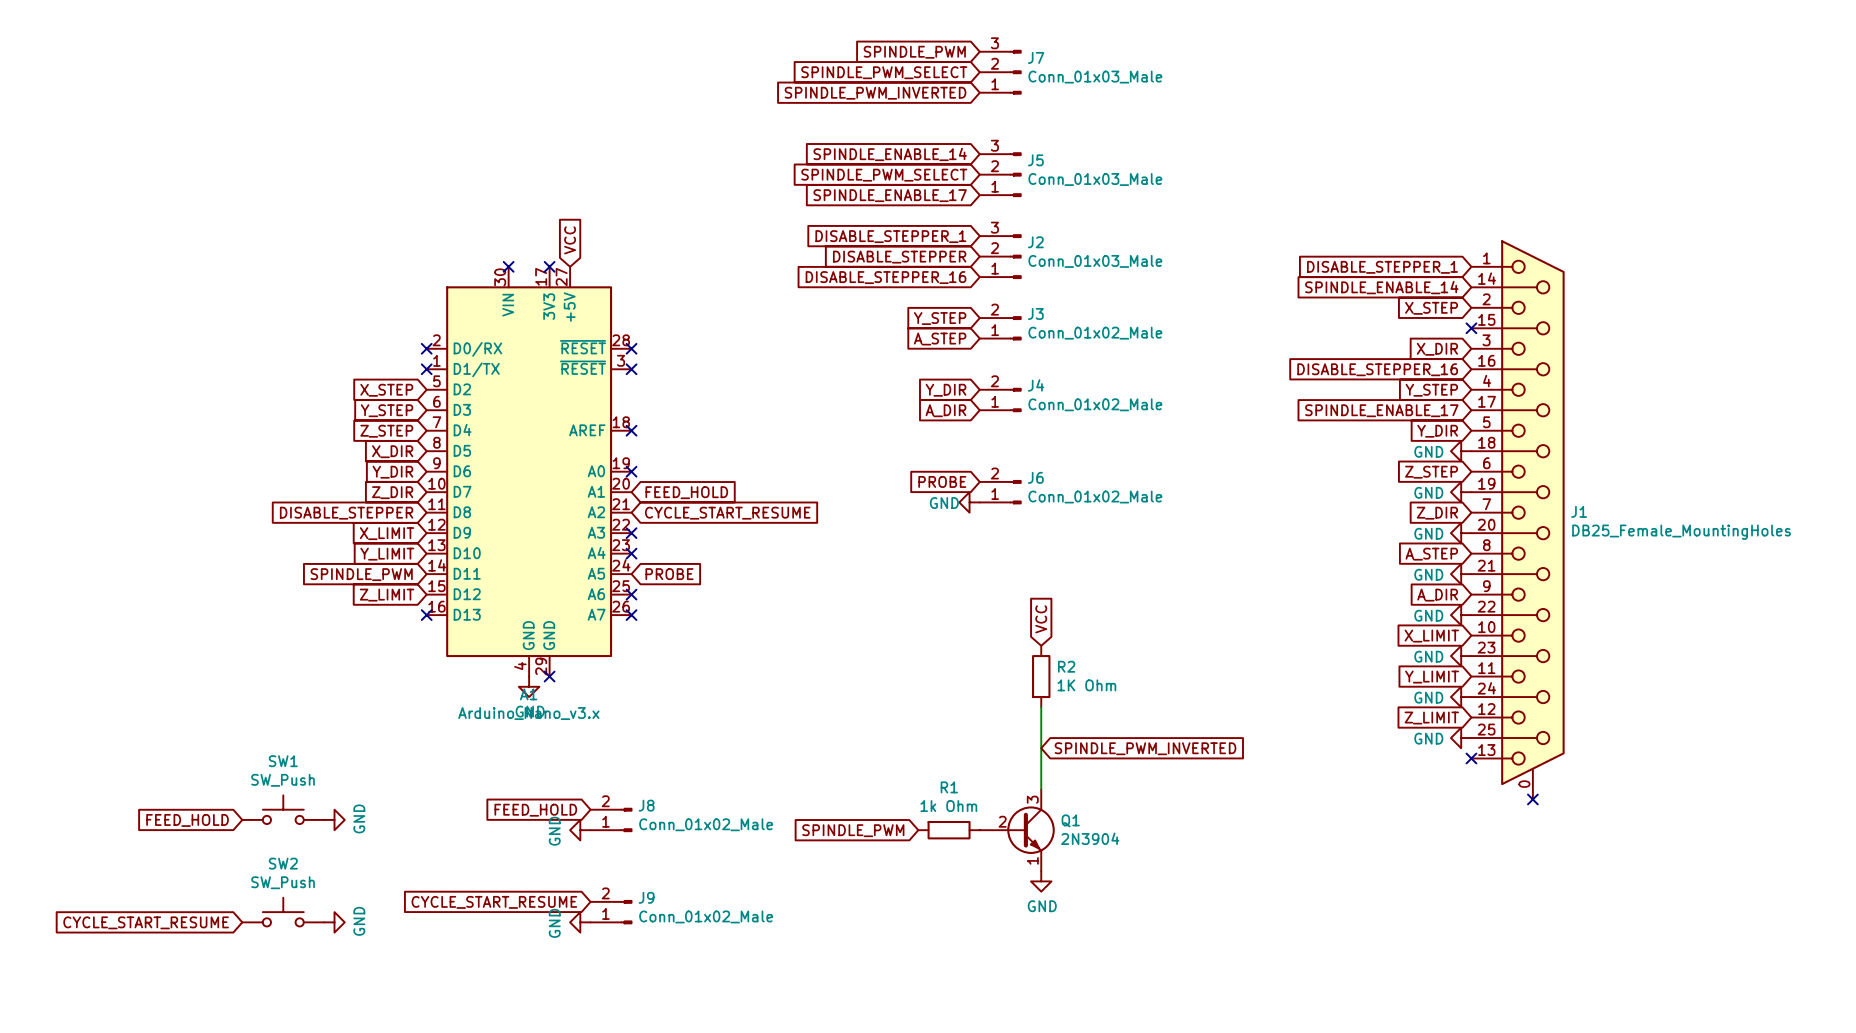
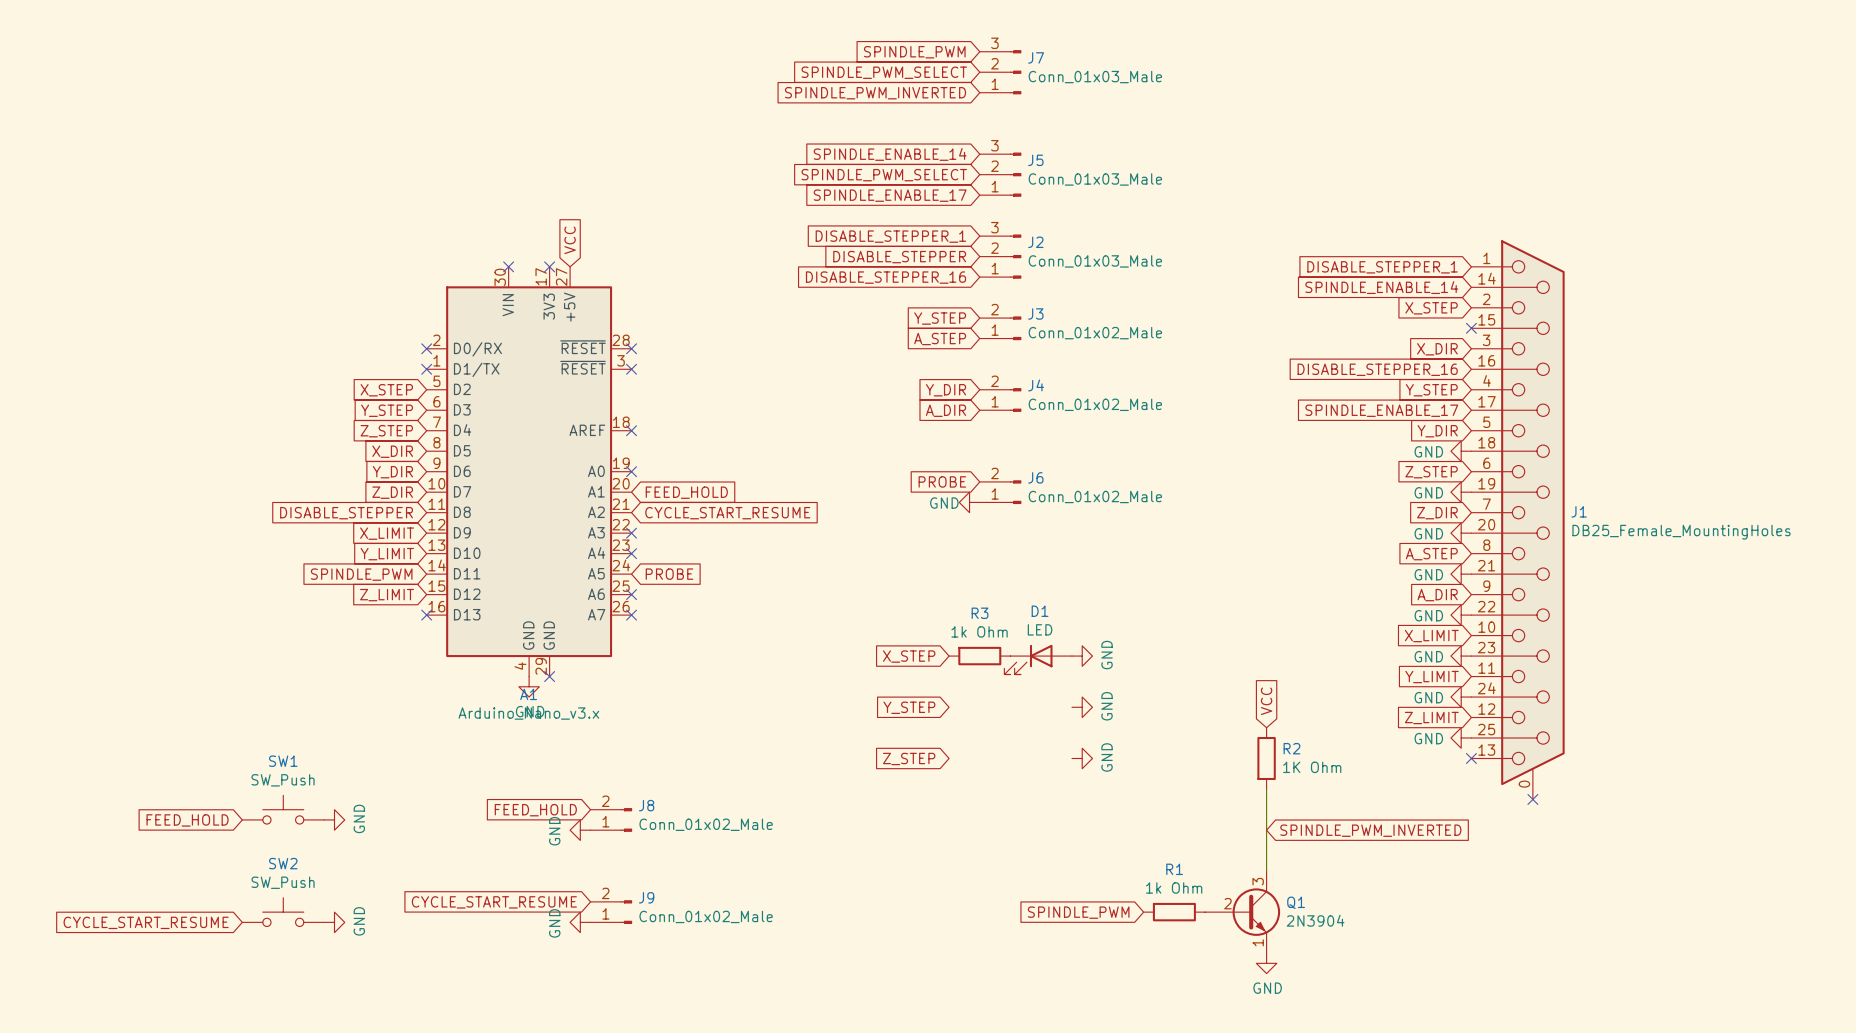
global label: VCC (1041, 619) -> none
global label: none -> X_STEP (909, 656)
R3: none -> 1k Ohm (979, 656)
power symbol: none -> GND (1082, 656)
D1: none -> LED (1038, 659)
R2 position: (1041, 676) -> (1266, 758)
global label: none -> VCC (1266, 701)
global label: none -> Y_STEP (909, 707)
wire: (1041, 707) (1041, 789) -> none
power symbol: none -> GND (1082, 707)
global label: SPINDLE_PWM_INVERTED (1145, 748) -> none
global label: none -> Z_STEP (909, 758)
power symbol: none -> GND (1082, 758)
wire: none -> (1266, 789) (1266, 871)
global label: SPINDLE_PWM (853, 830) -> none
R1 position: (949, 830) -> (1174, 912)
Q1 position: (1017, 830) -> (1242, 912)
global label: none -> SPINDLE_PWM_INVERTED (1370, 830)
power symbol: GND (1041, 881) -> none
global label: none -> SPINDLE_PWM (1078, 912)
power symbol: none -> GND (1266, 963)

